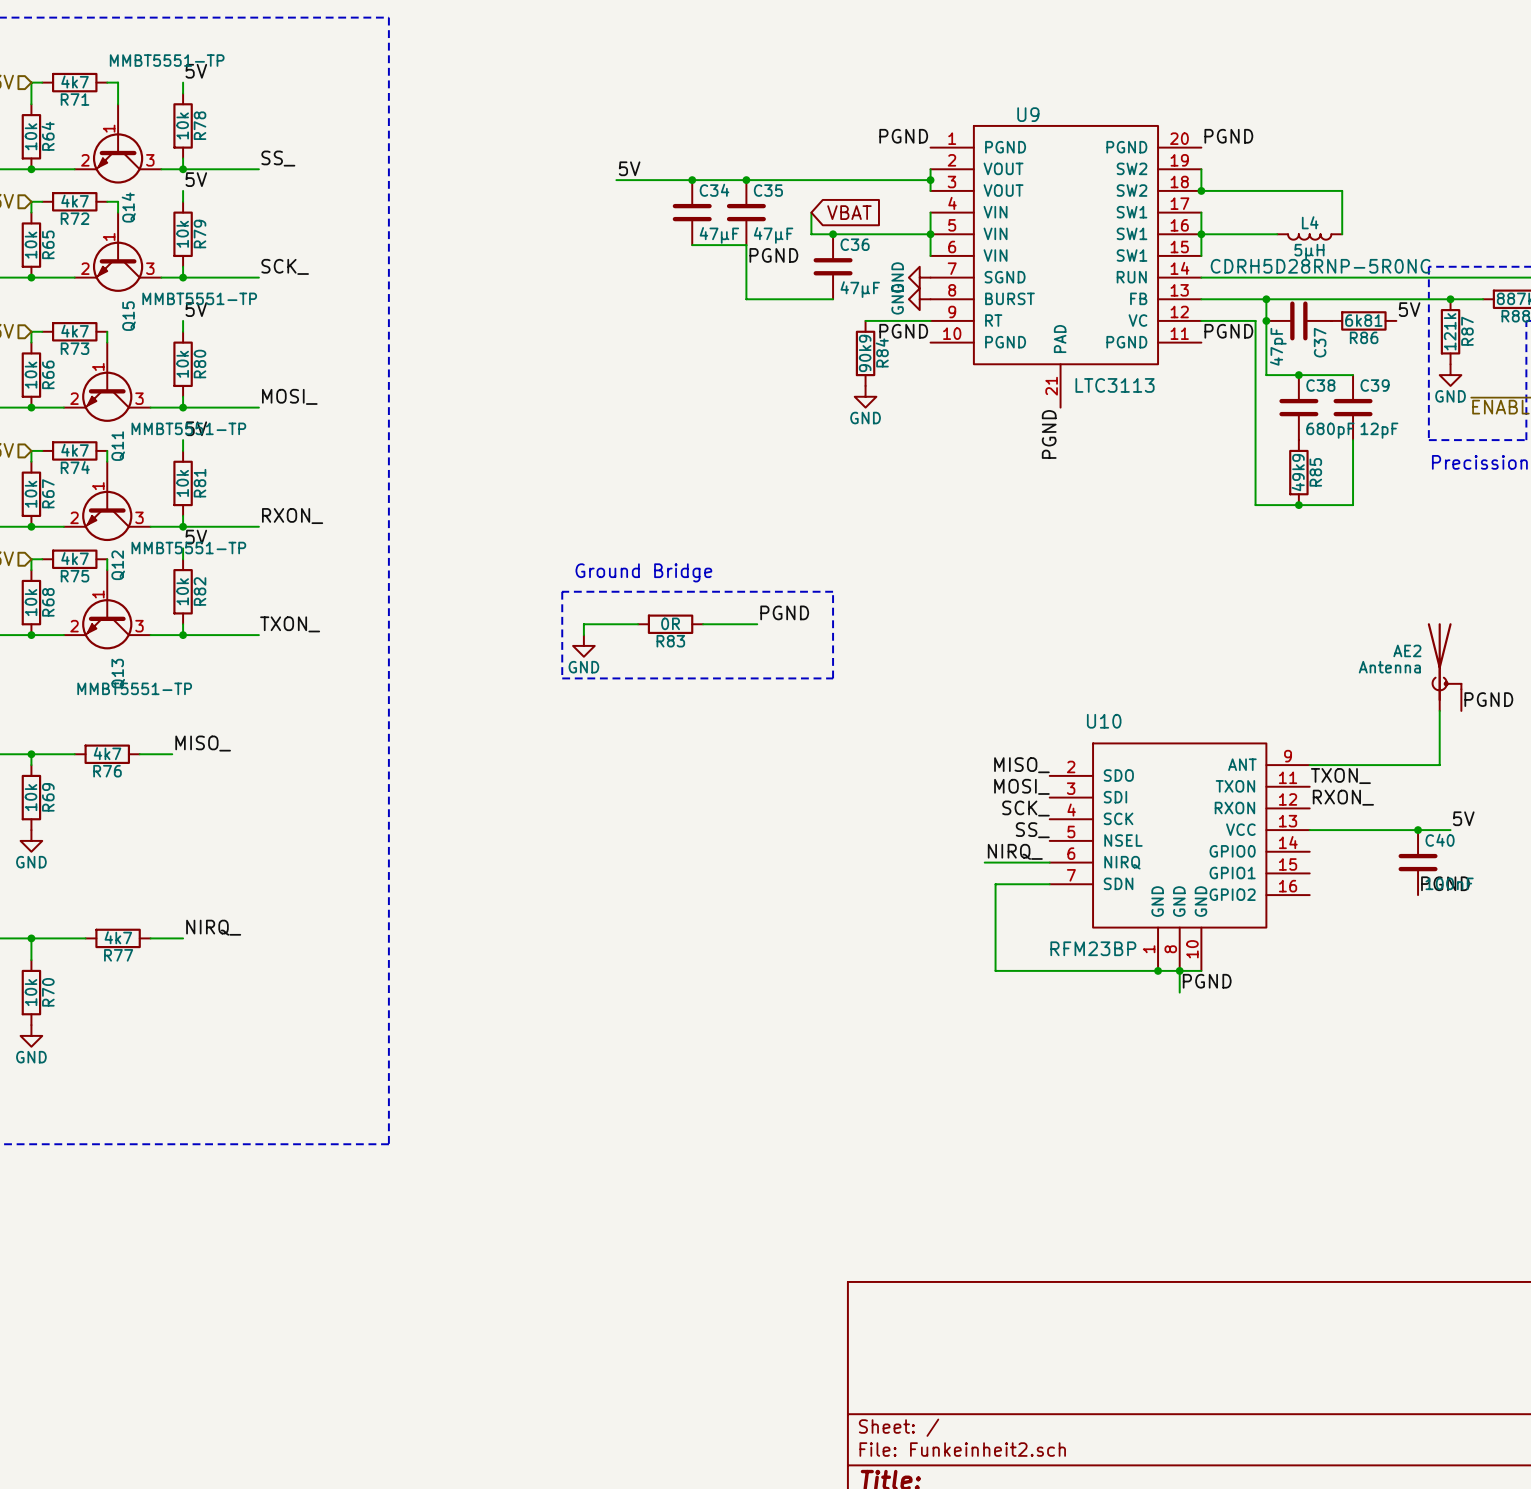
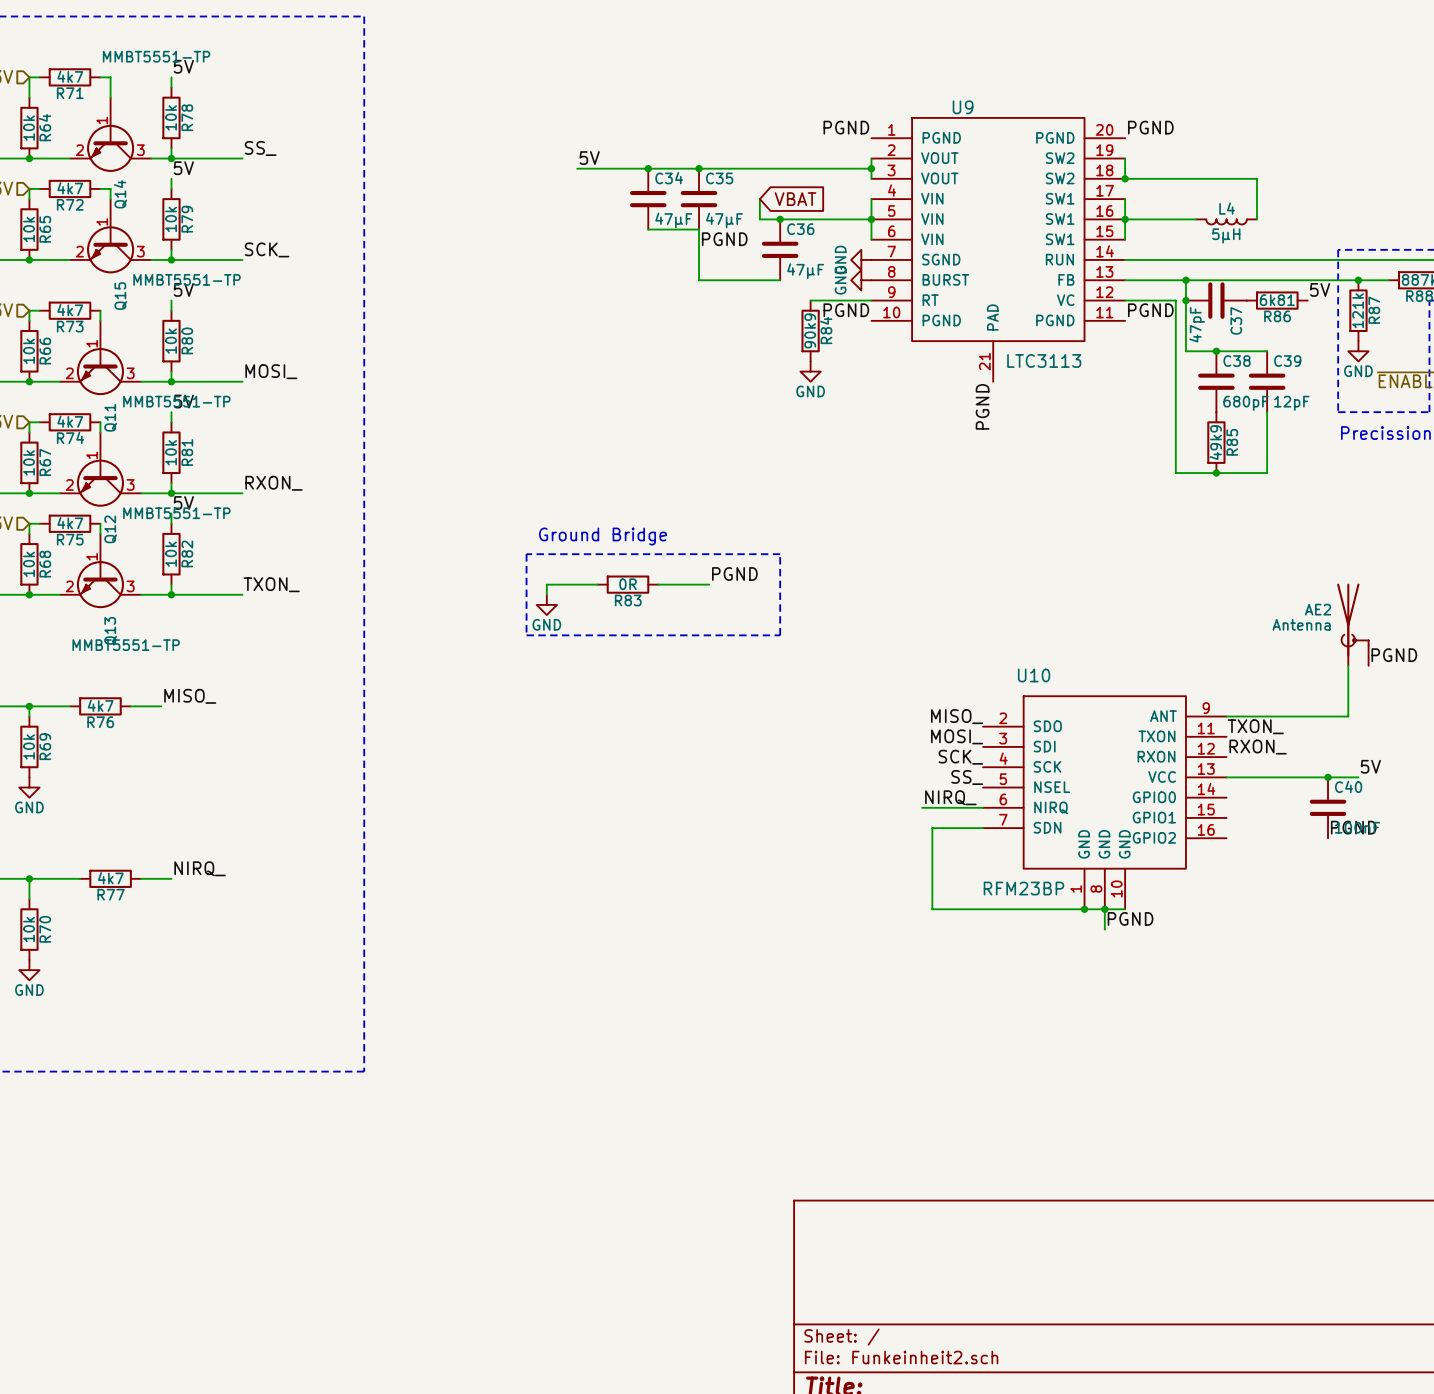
L4 text: CDRH5D28RNP-5R0NC (1320, 266) -> none

